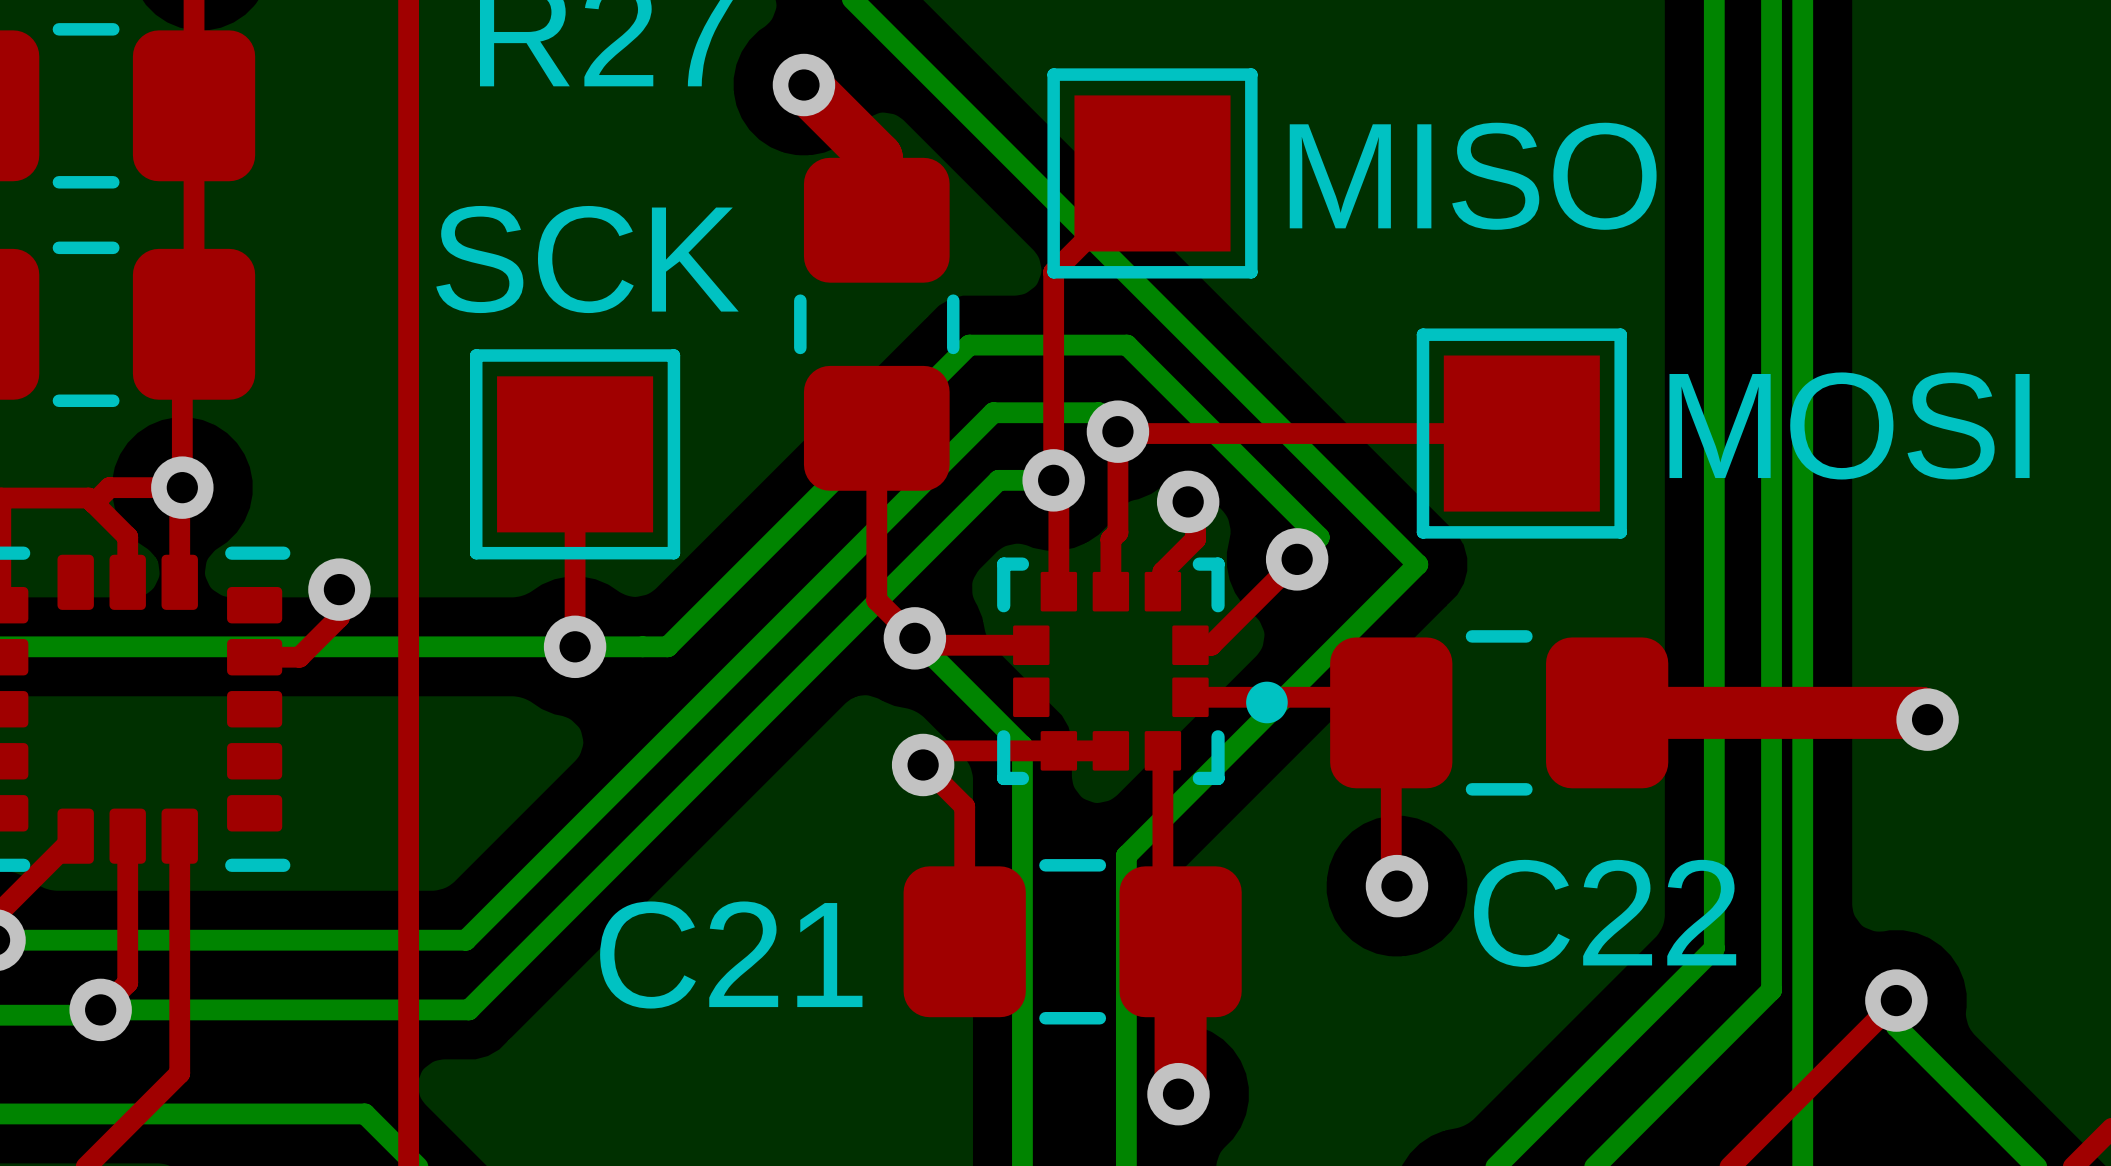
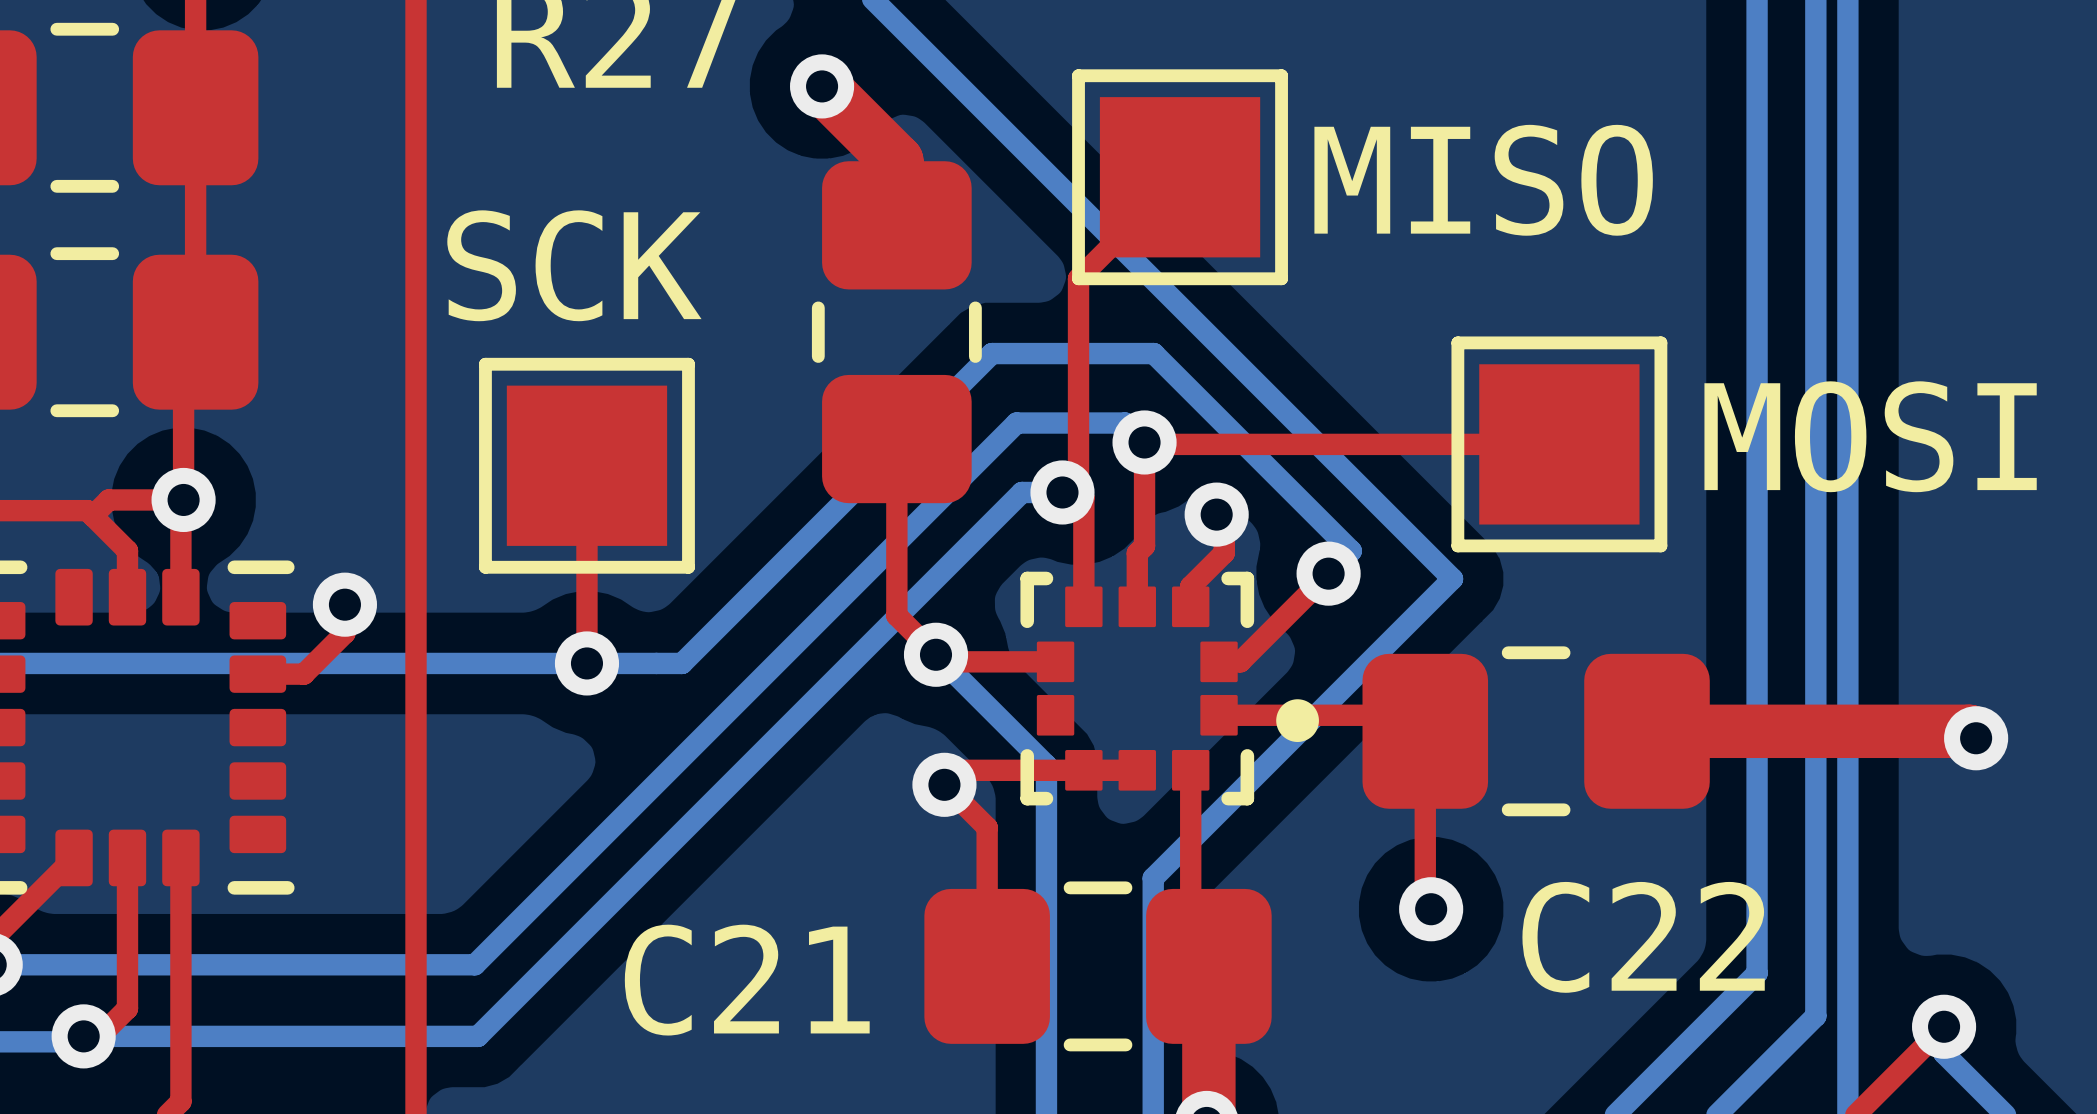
via position: (1053, 480) -> (1062, 492)
via position: (100, 1009) -> (83, 1036)

